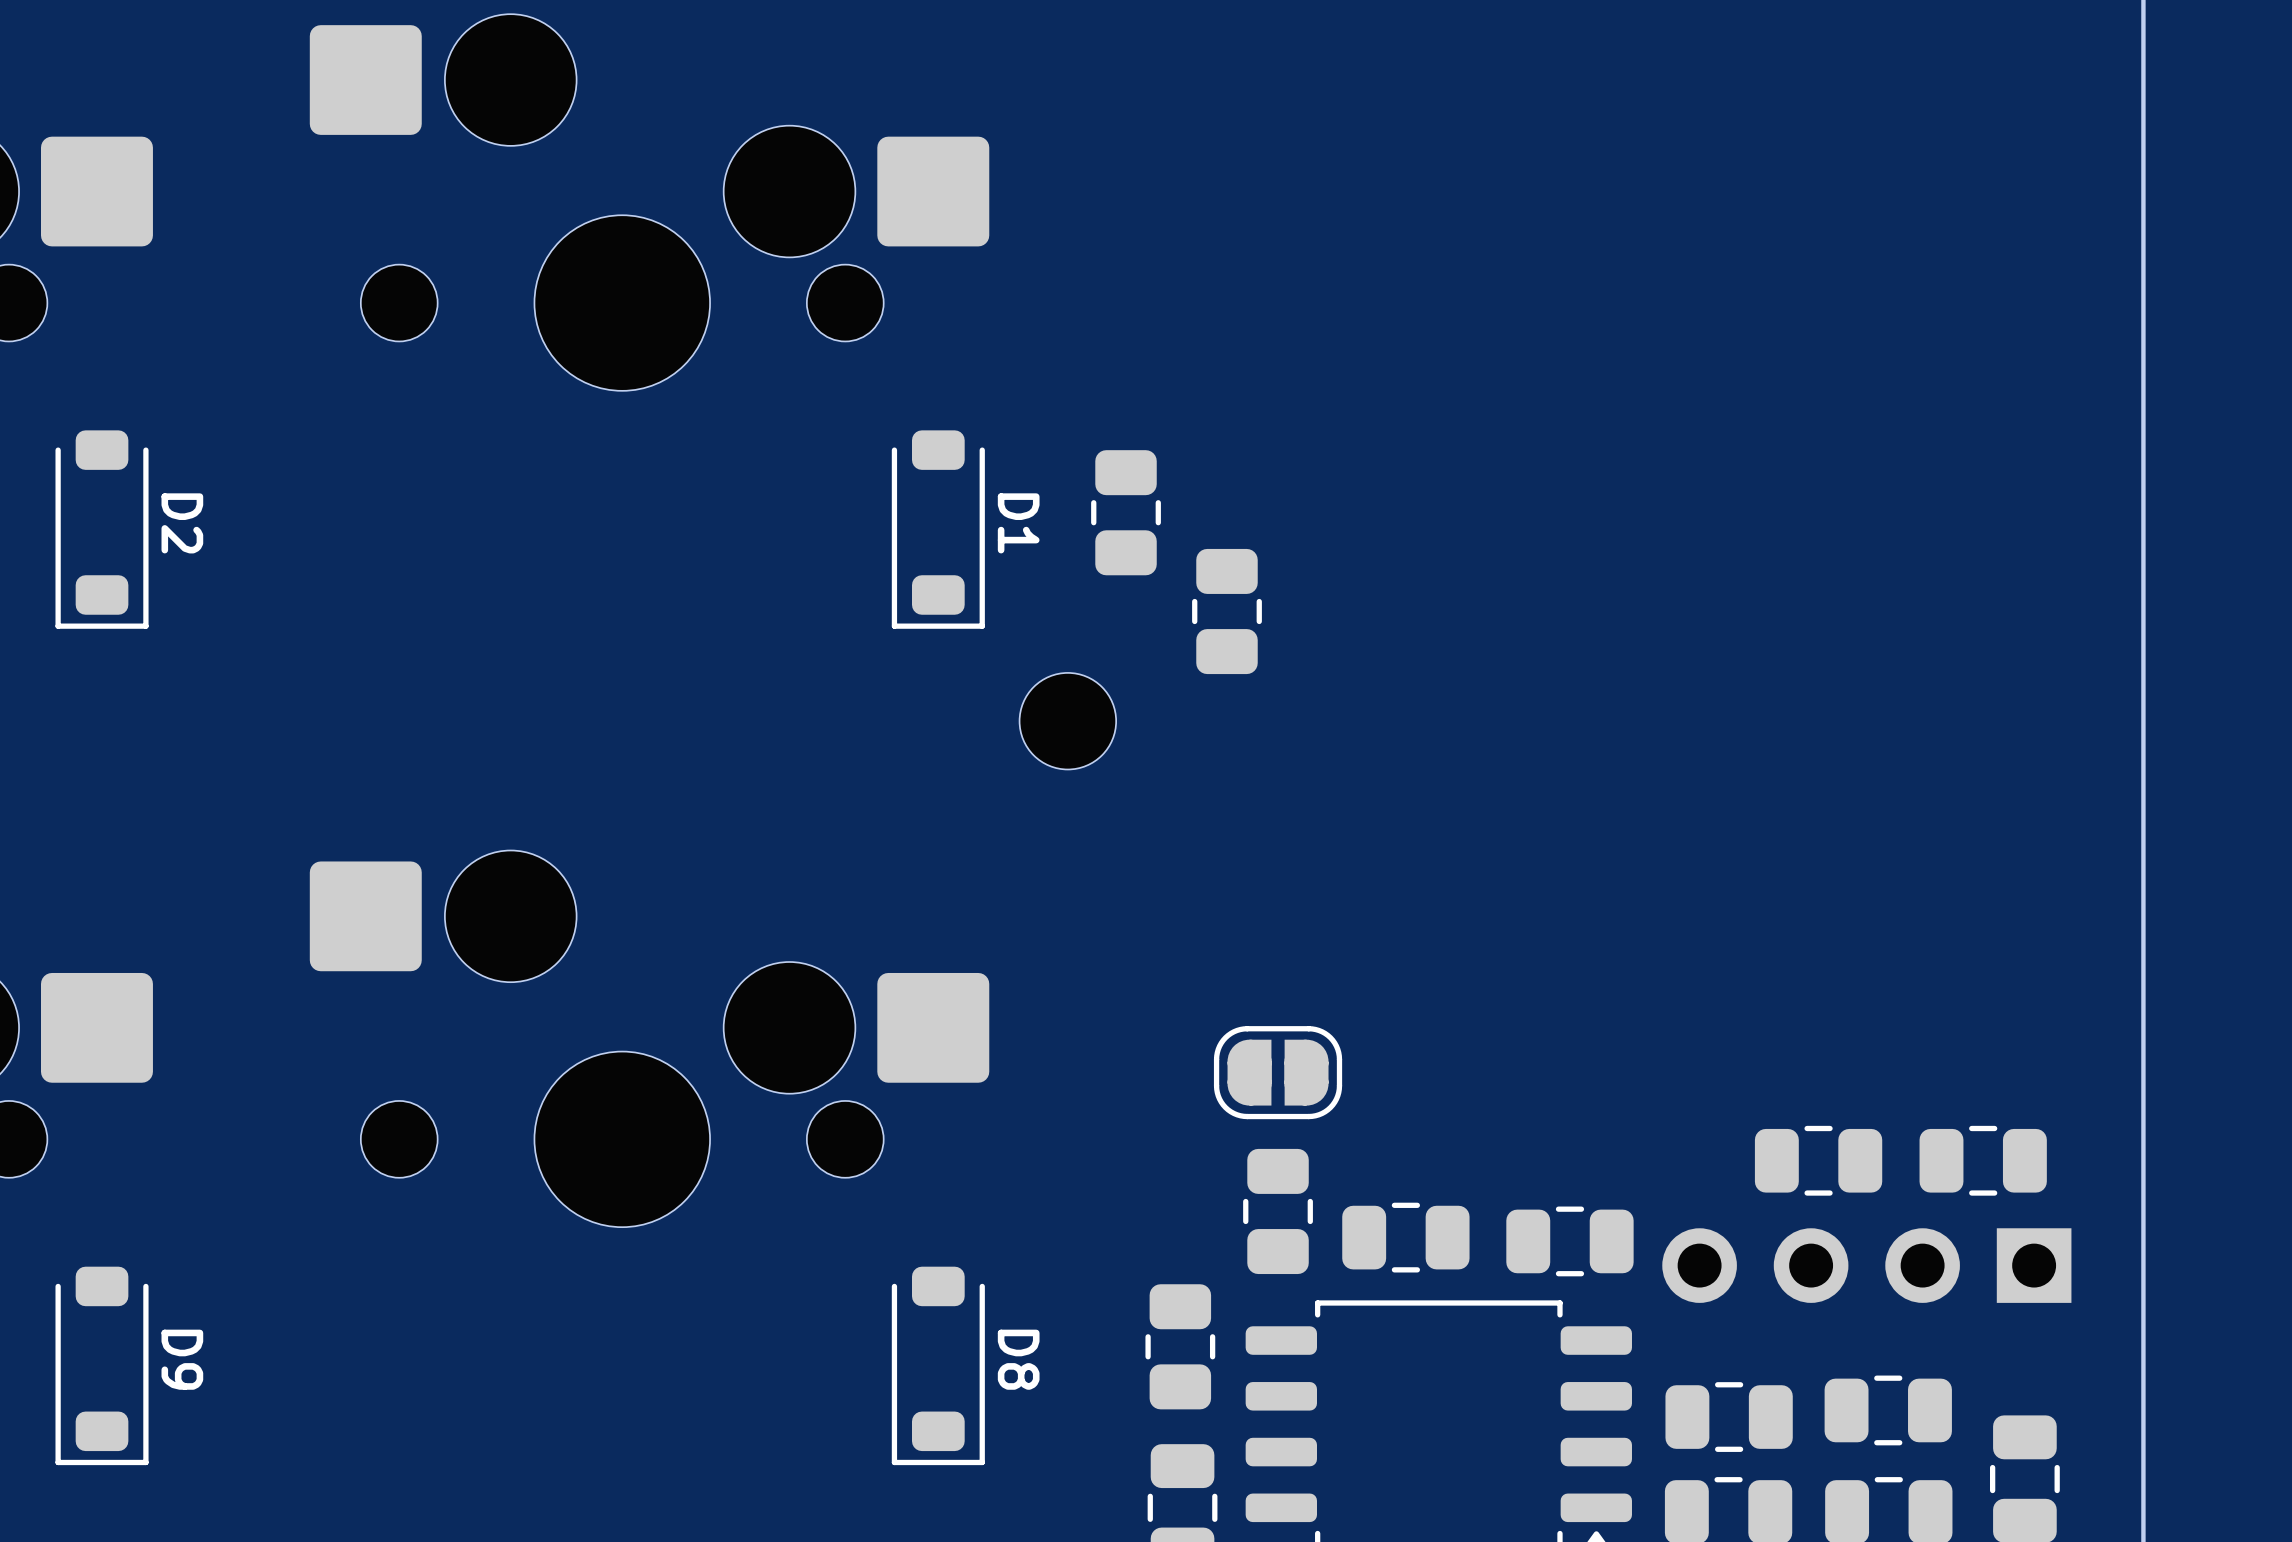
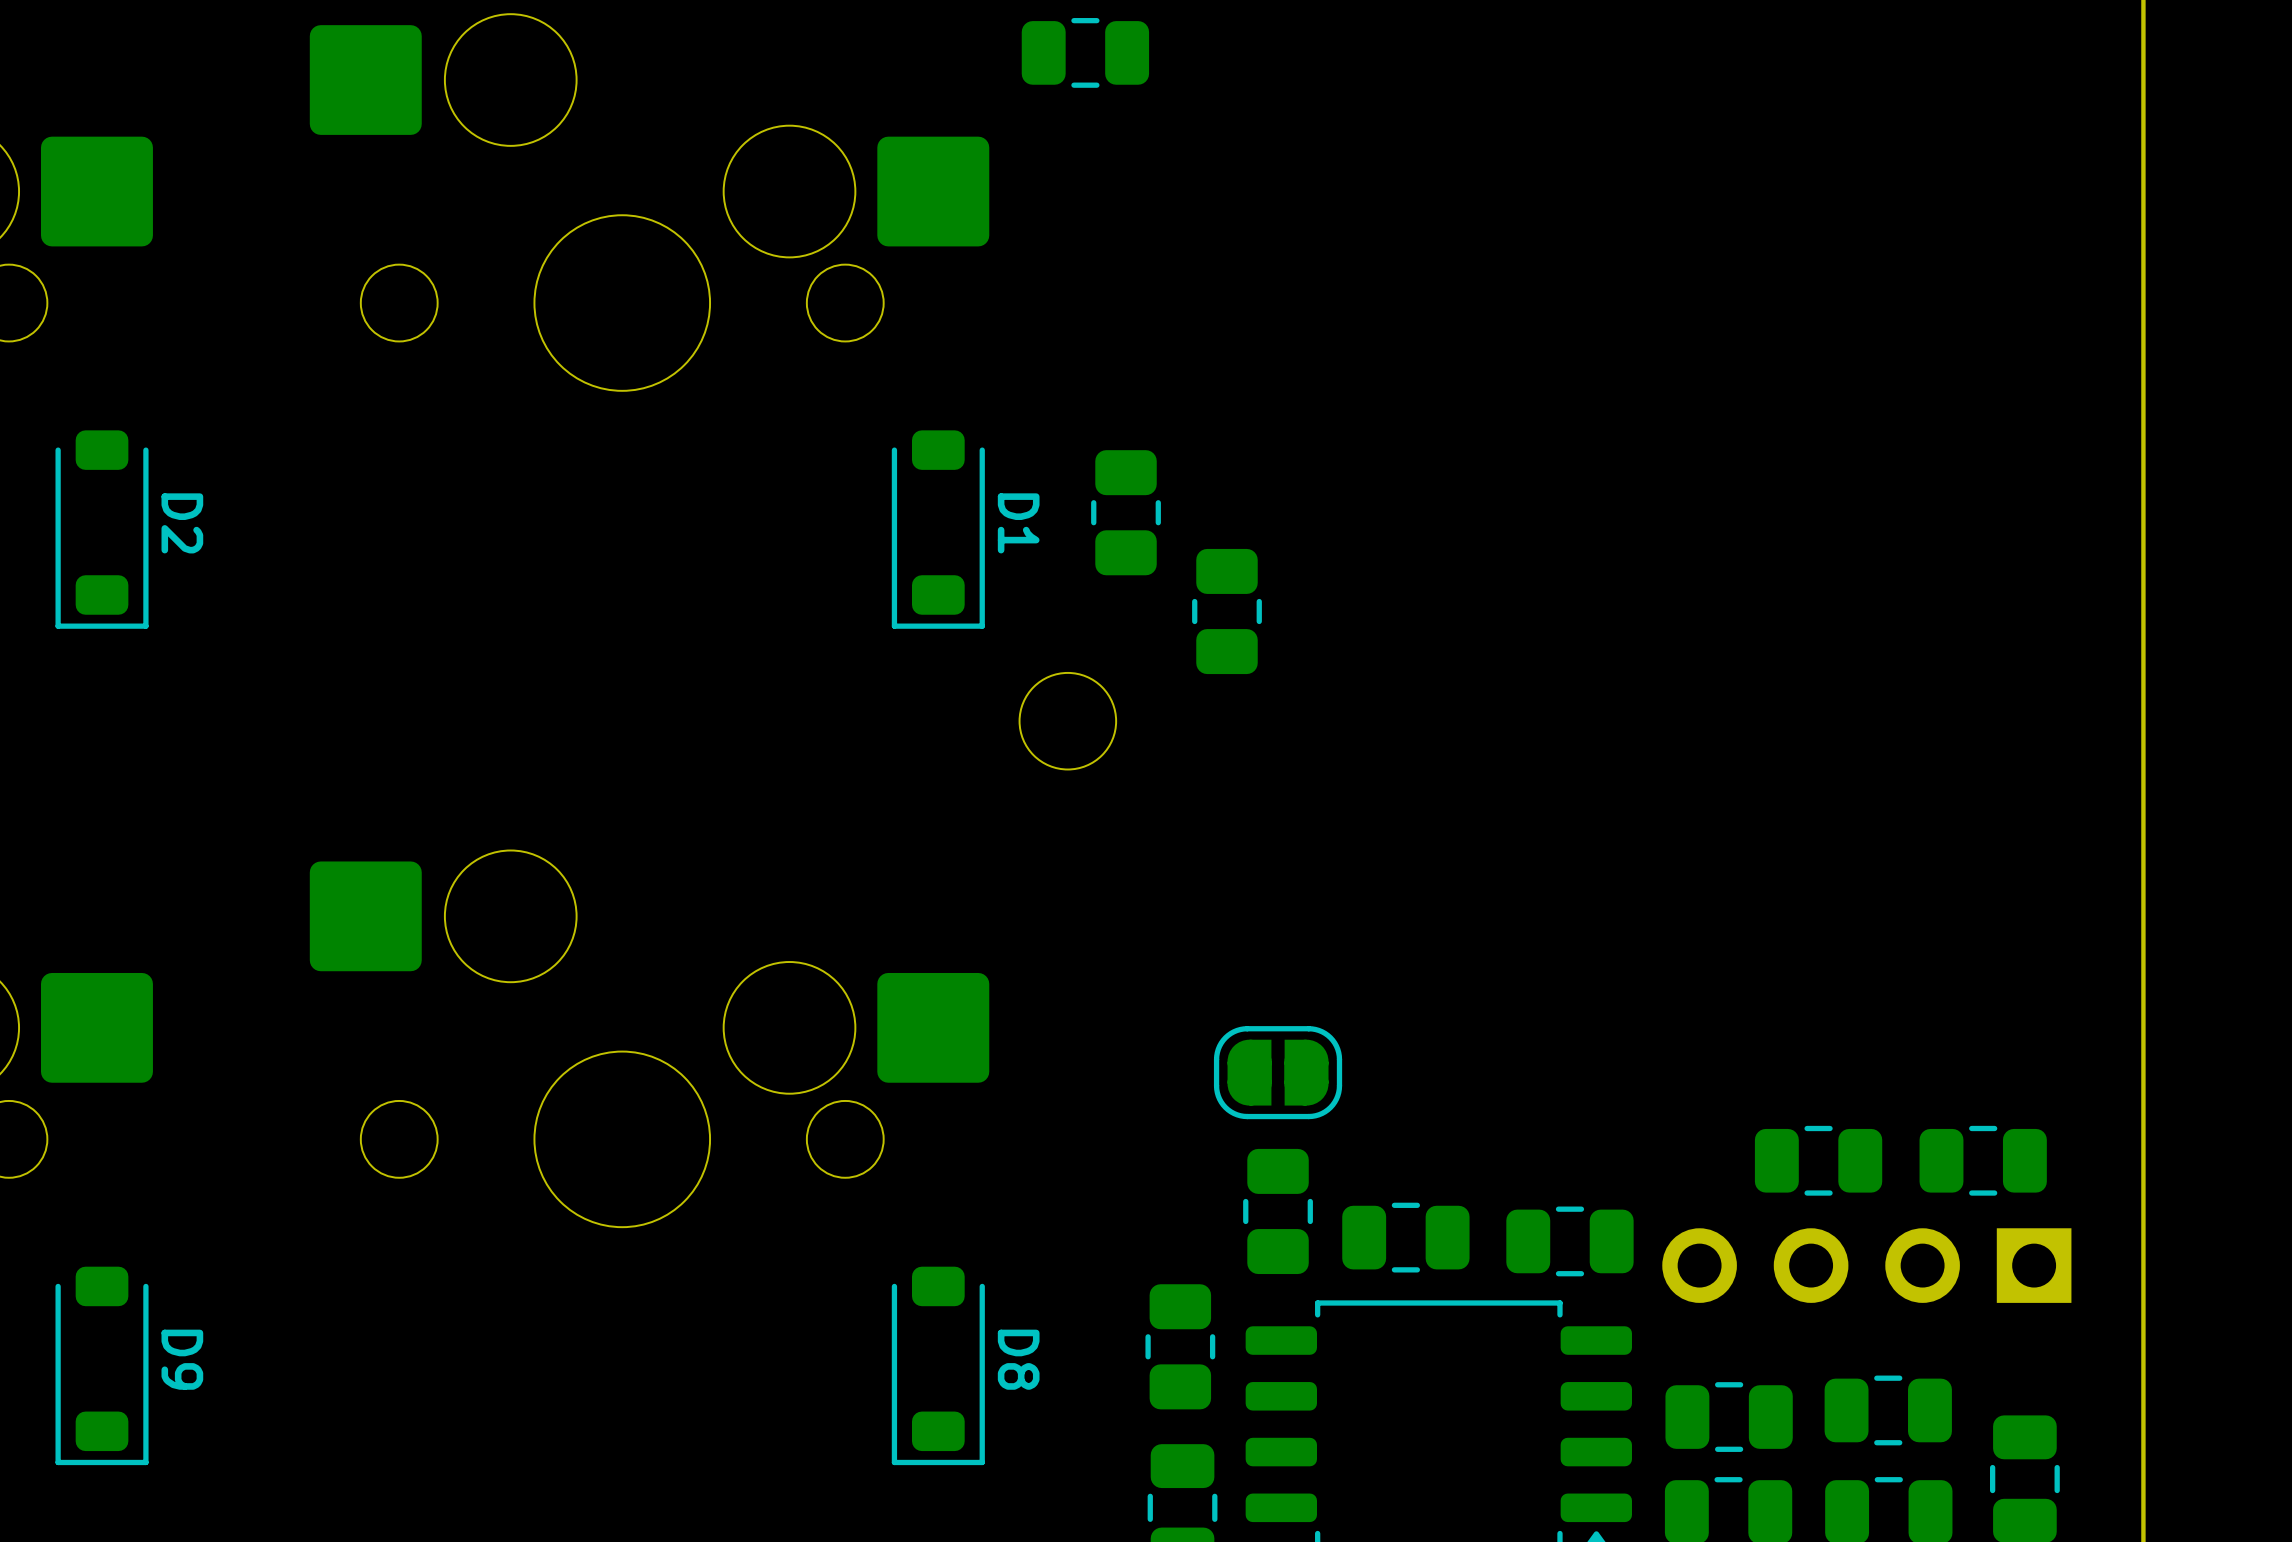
part: none -> (1085, 52)

